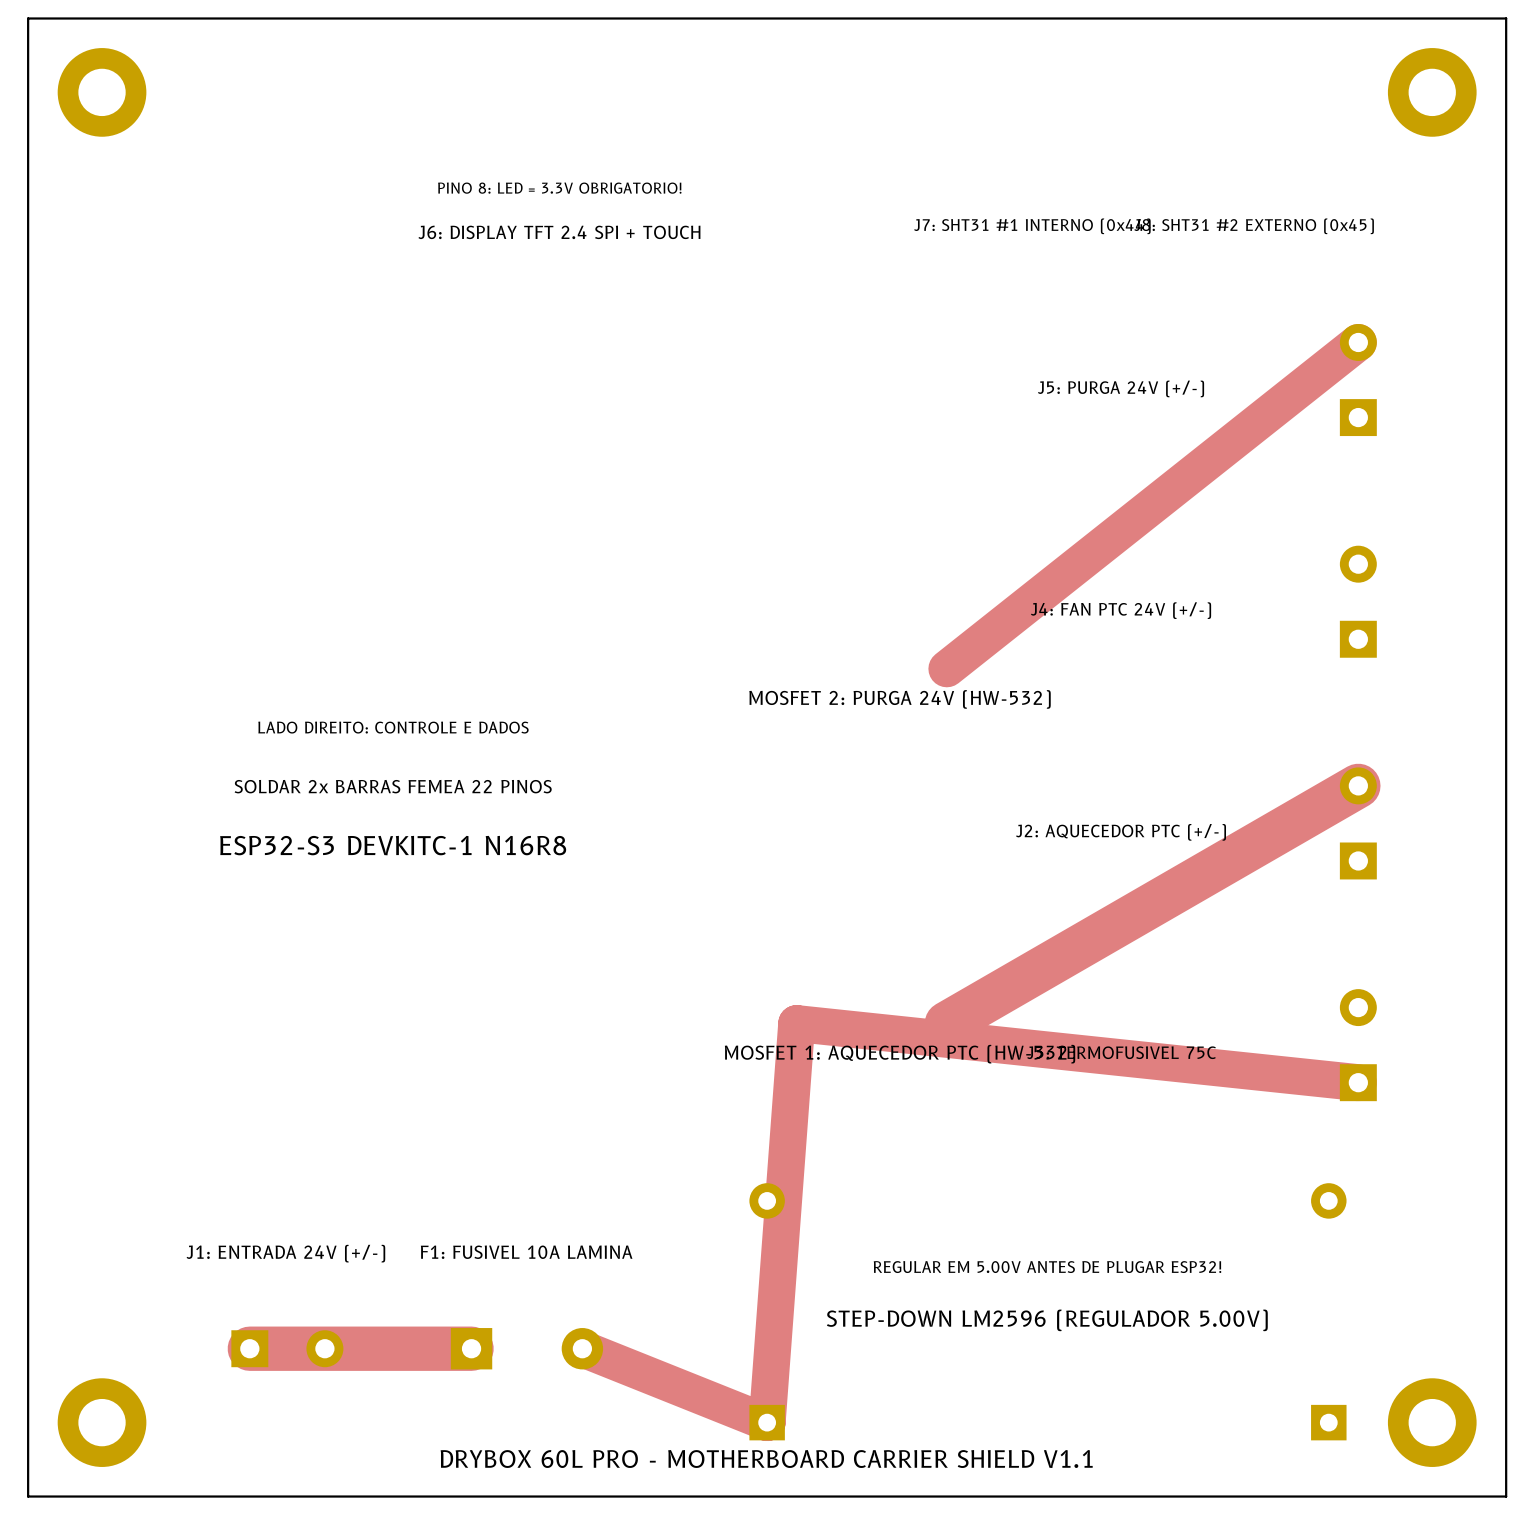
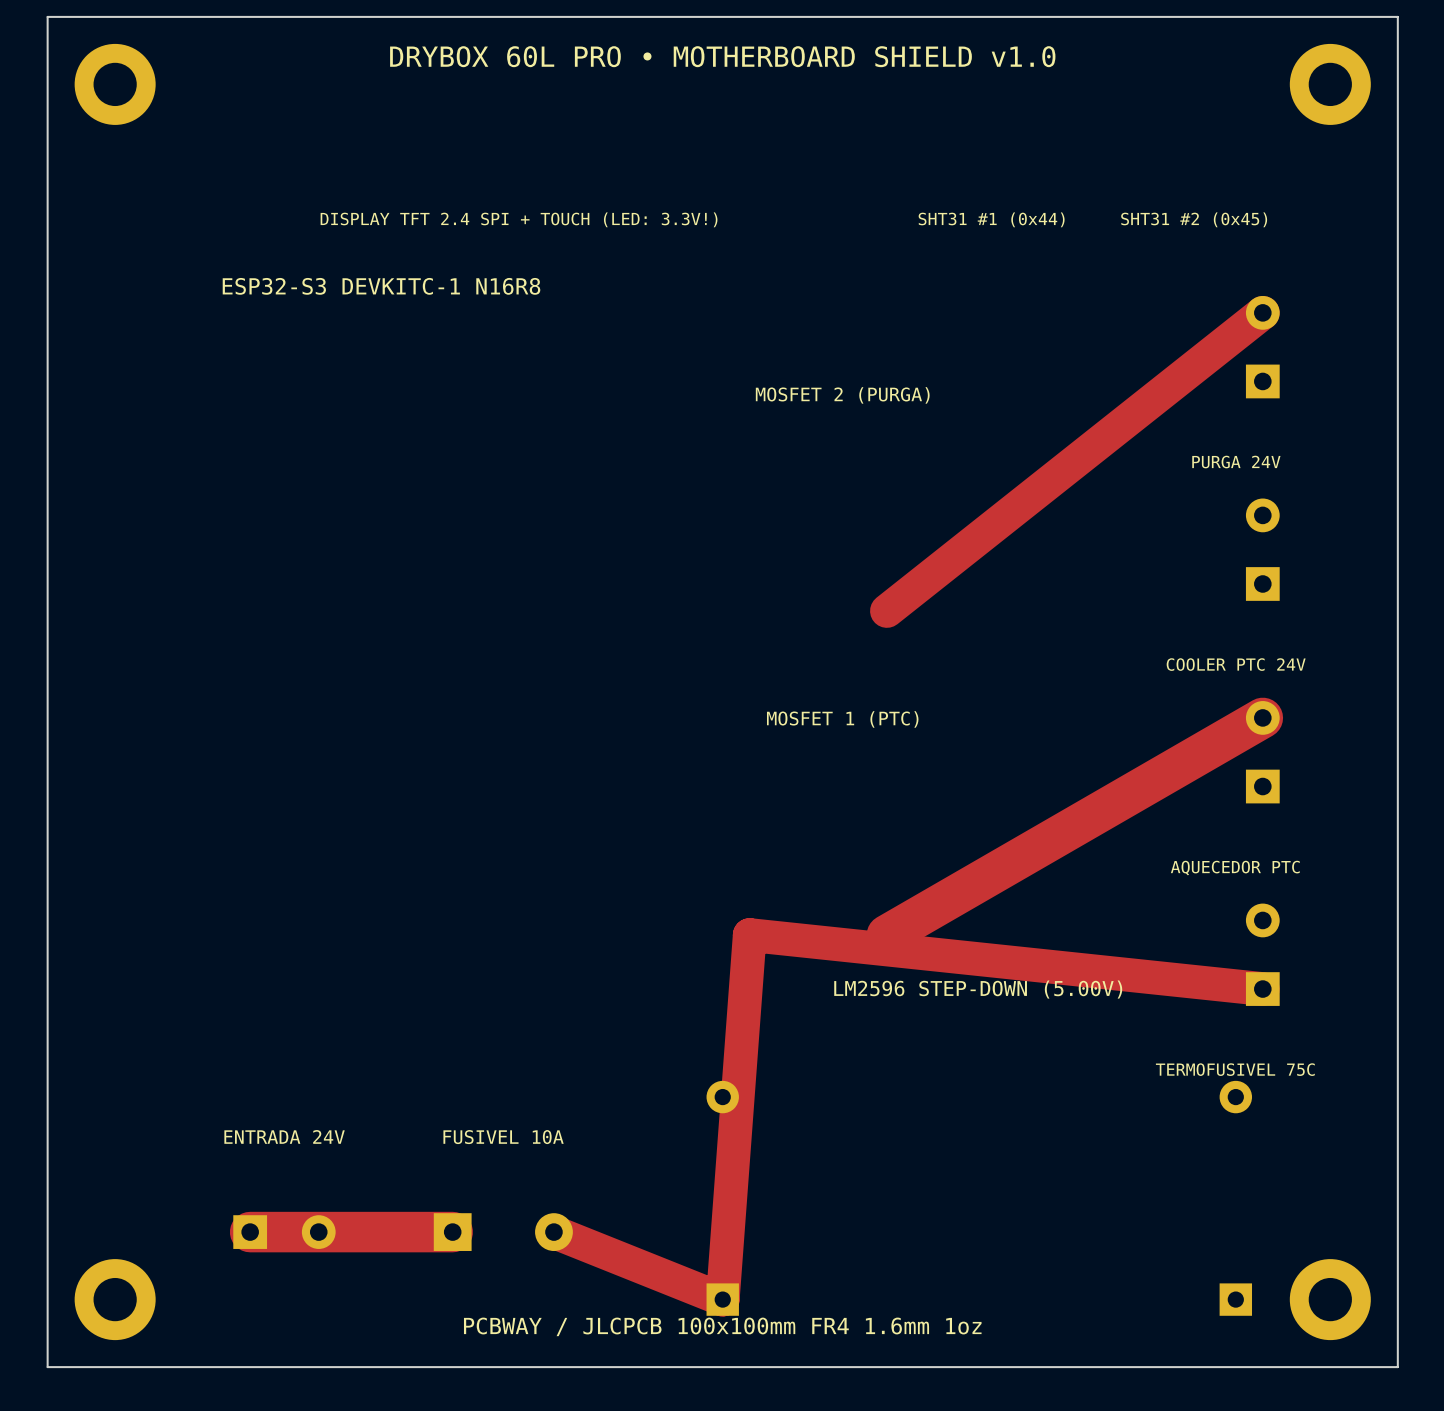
text: none -> DRYBOX 60L PRO • MOTHERBOARD SHIELD v1.0 (722, 56)
text: PINO 8: LED = 3.3V OBRIGATORIO! (559, 188) -> none
text: J7: SHT31 #1 INTERNO (0x44) (1032, 226) -> SHT31 #1 (0x44) (991, 219)
text: J8: SHT31 #2 EXTERNO (0x45) (1254, 226) -> SHT31 #2 (0x45) (1194, 219)
text: J6: DISPLAY TFT 2.4 SPI + TOUCH (559, 232) -> DISPLAY TFT 2.4 SPI + TOUCH (LED: 3.3V!) (519, 219)
text: none -> ESP32-S3 DEVKITC-1 N16R8 (381, 286)
text: J5: PURGA 24V (+/-) (1121, 388) -> none
text: none -> MOSFET 2 (PURGA) (842, 395)
text: none -> PURGA 24V (1236, 462)
text: J4: FAN PTC 24V (+/-) (1121, 610) -> none
text: MOSFET 2: PURGA 24V (HW-532) (900, 699) -> none
text: LADO DIREITO: CONTROLE E DADOS (393, 727) -> none
text: none -> COOLER PTC 24V (1236, 664)
text: SOLDAR 2x BARRAS FEMEA 22 PINOS (393, 786) -> none
text: none -> MOSFET 1 (PTC) (842, 719)
text: J2: AQUECEDOR PTC (+/-) (1121, 832) -> none
text: ESP32-S3 DEVKITC-1 N16R8 (393, 845) -> none
text: none -> AQUECEDOR PTC (1235, 868)
text: J3: TERMOFUSIVEL 75C (1121, 1052) -> none
text: MOSFET 1: AQUECEDOR PTC (HW-532) (900, 1054) -> none
text: none -> LM2596 STEP-DOWN (5.00V) (978, 989)
text: none -> TERMOFUSIVEL 75C (1235, 1069)
text: F1: FUSIVEL 10A LAMINA (526, 1252) -> FUSIVEL 10A (503, 1137)
text: J1: ENTRADA 24V (+/-) (285, 1253) -> ENTRADA 24V (284, 1136)
text: REGULAR EM 5.00V ANTES DE PLUGAR ESP32! (1047, 1267) -> none
text: STEP-DOWN LM2596 (REGULADOR 5.00V) (1047, 1320) -> none
text: DRYBOX 60L PRO - MOTHERBOARD CARRIER SHIELD V1.1 (766, 1459) -> PCBWAY / JLCPCB 100x100mm FR4 1.6mm 1oz (722, 1326)

